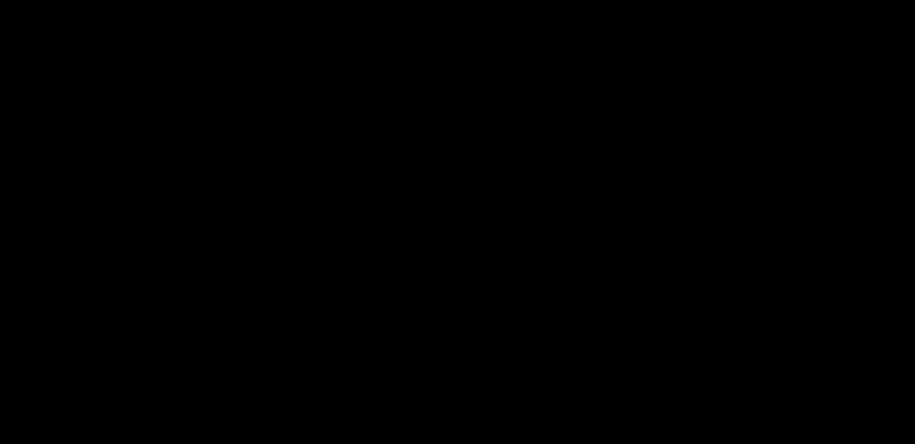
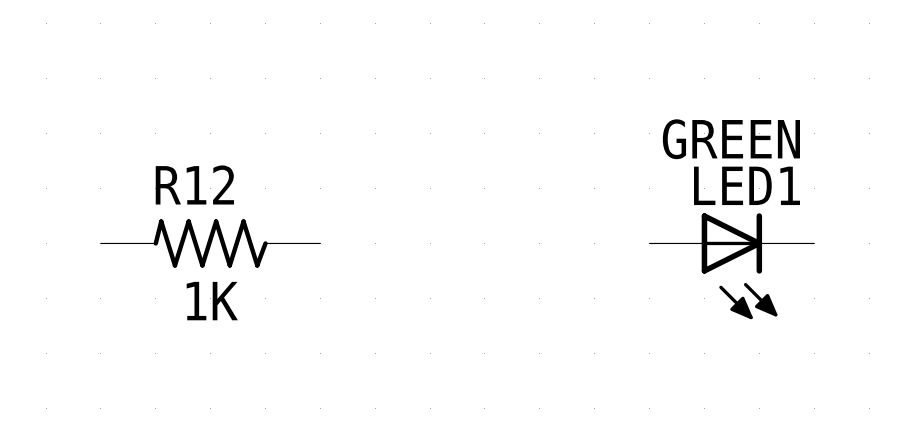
R12: none -> 1K (210, 243)
LED1: none -> GREEN (731, 266)

